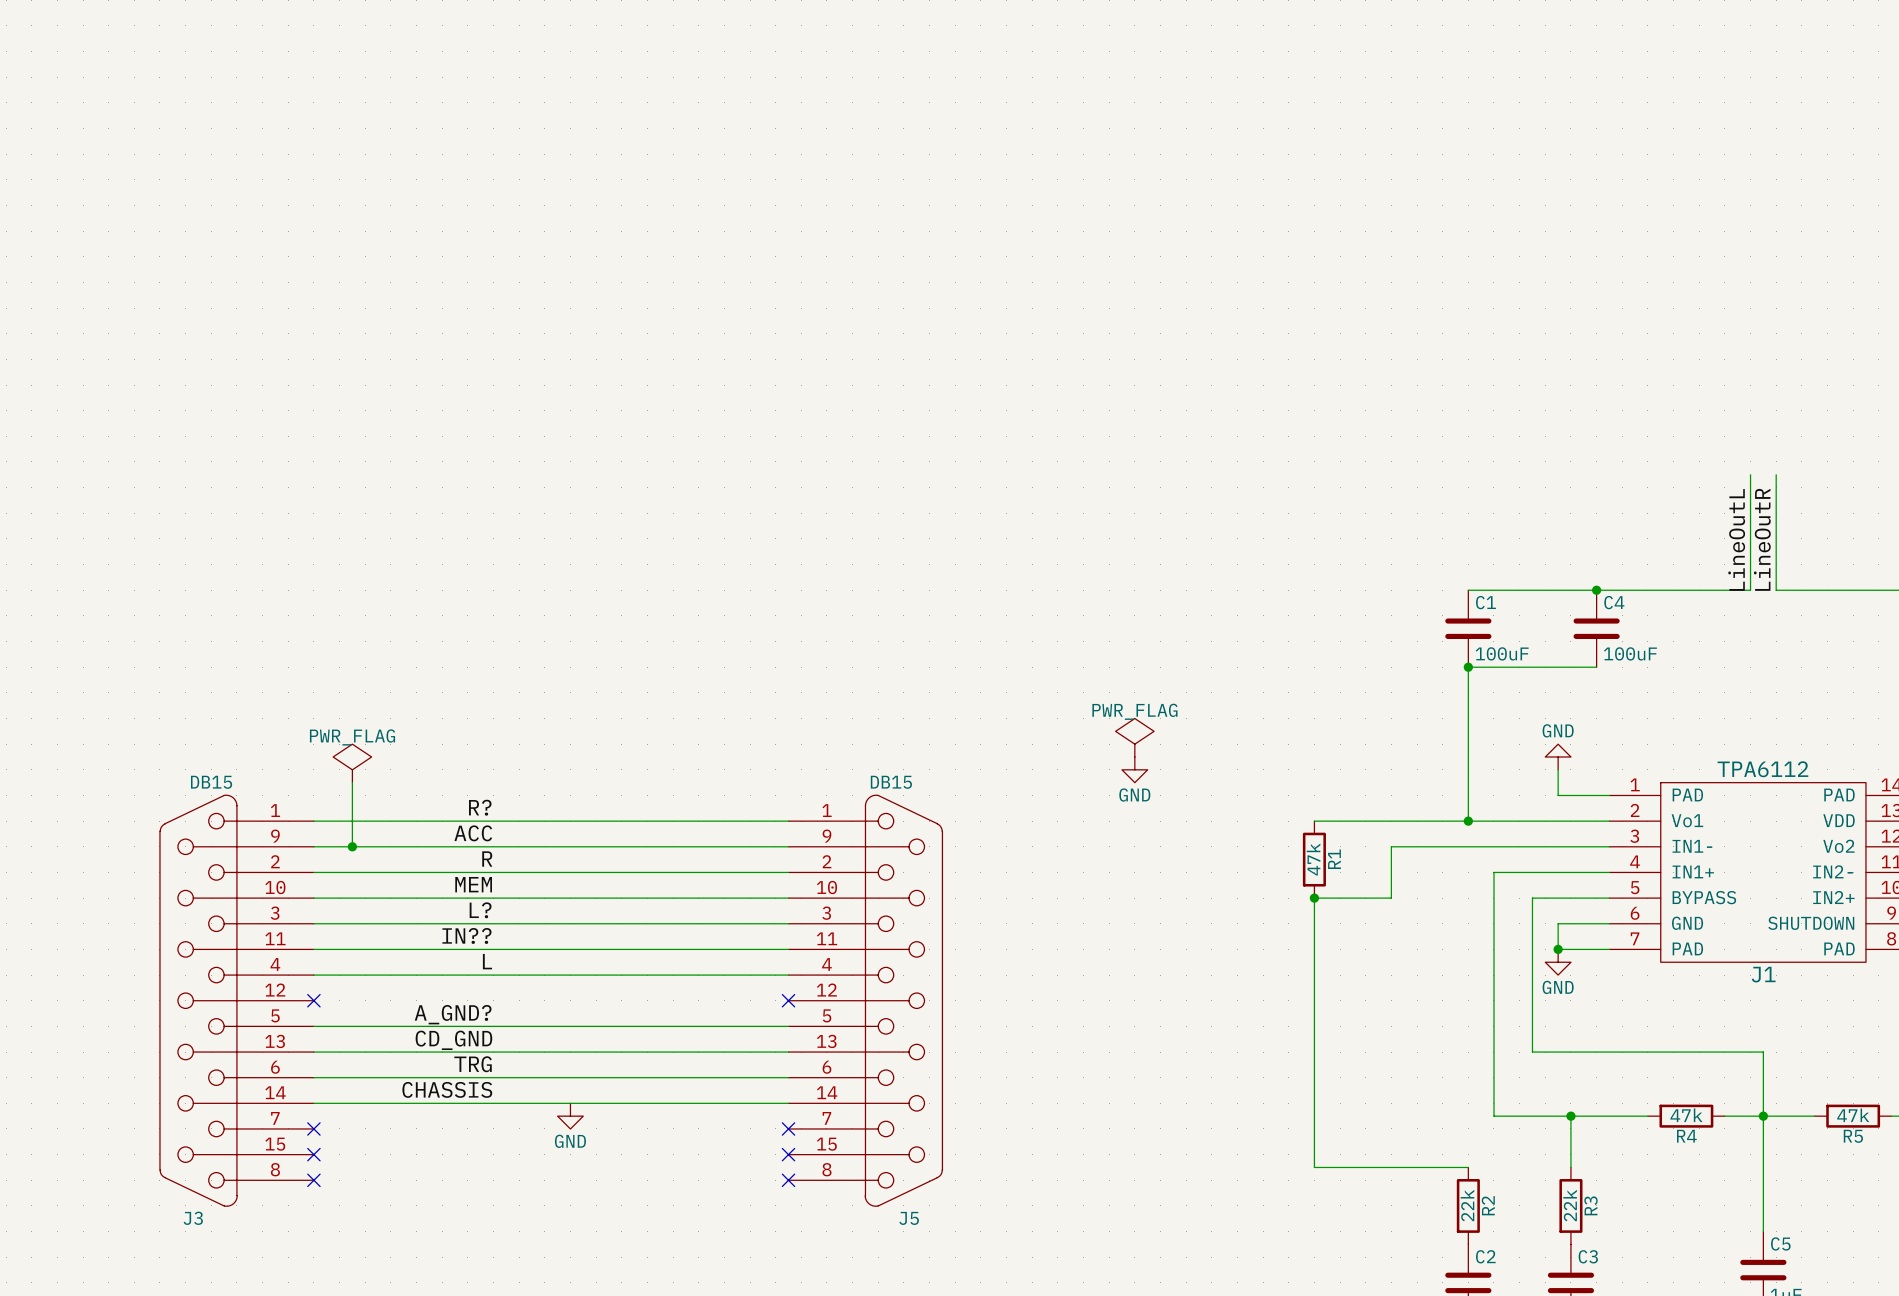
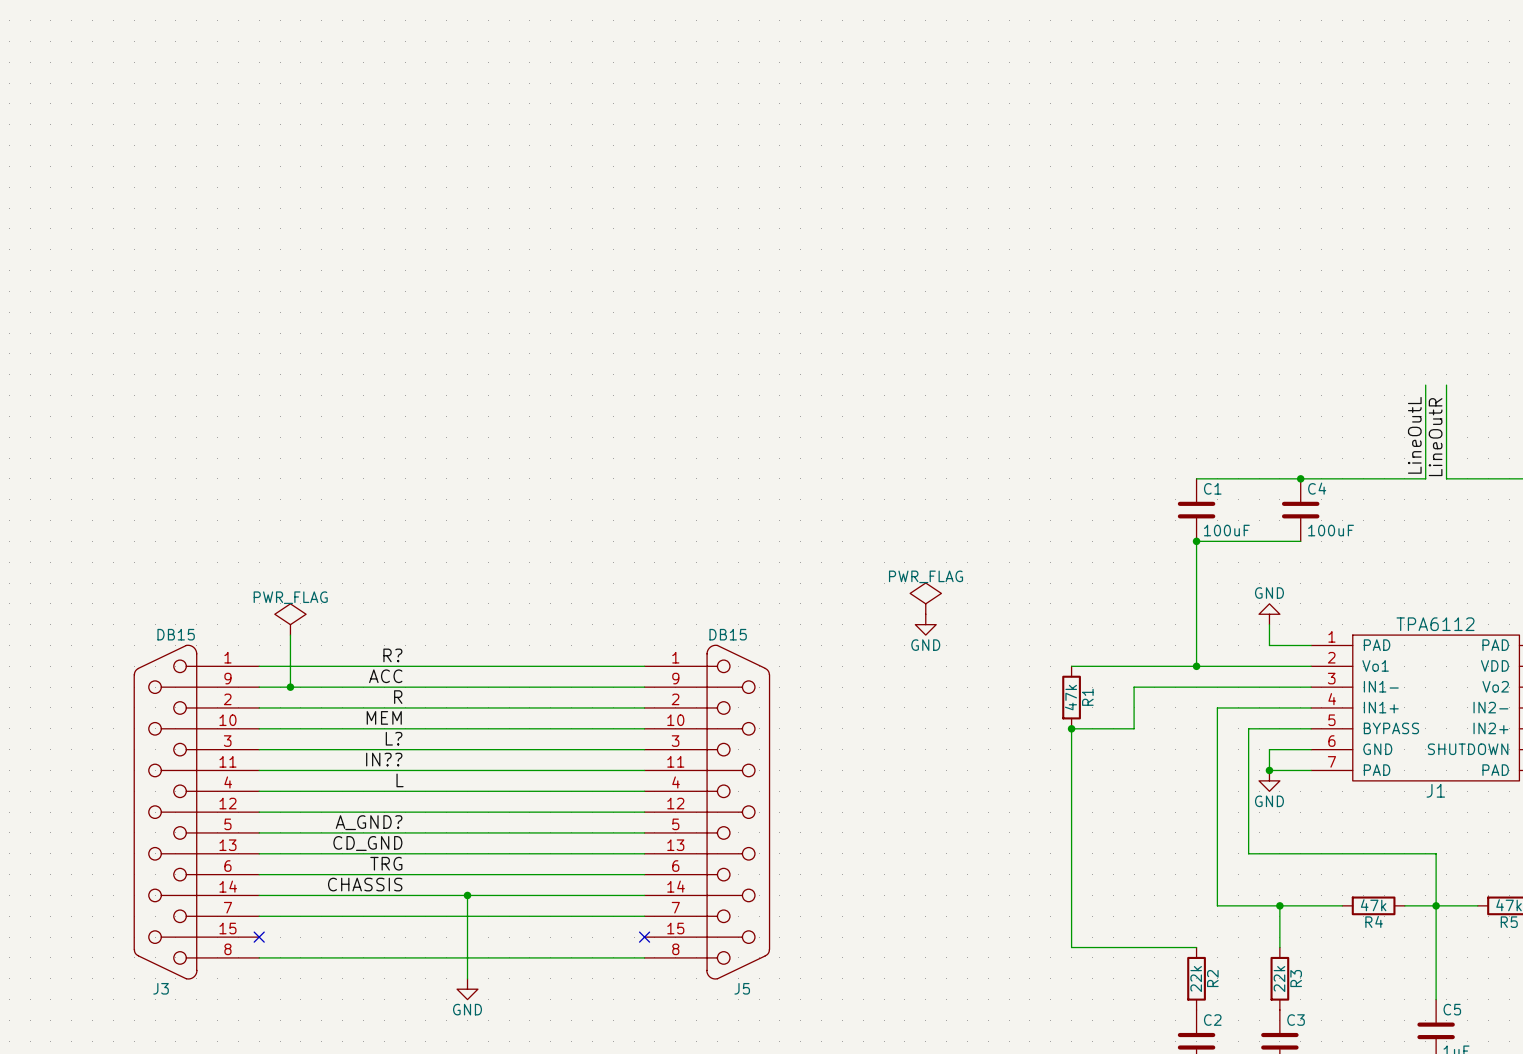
wire: none -> (259, 812) (644, 812)
no-connect mark: (313, 1000) -> none
no-connect mark: (788, 1000) -> none
wire: none -> (467, 895) (467, 978)
junction: none -> (467, 895)
power symbol position: GND (570, 1116) -> GND (467, 989)
wire: none -> (259, 916) (644, 916)
no-connect mark: (313, 1128) -> none
no-connect mark: (788, 1128) -> none
wire: none -> (259, 957) (644, 957)
no-connect mark: (313, 1180) -> none
no-connect mark: (788, 1180) -> none

